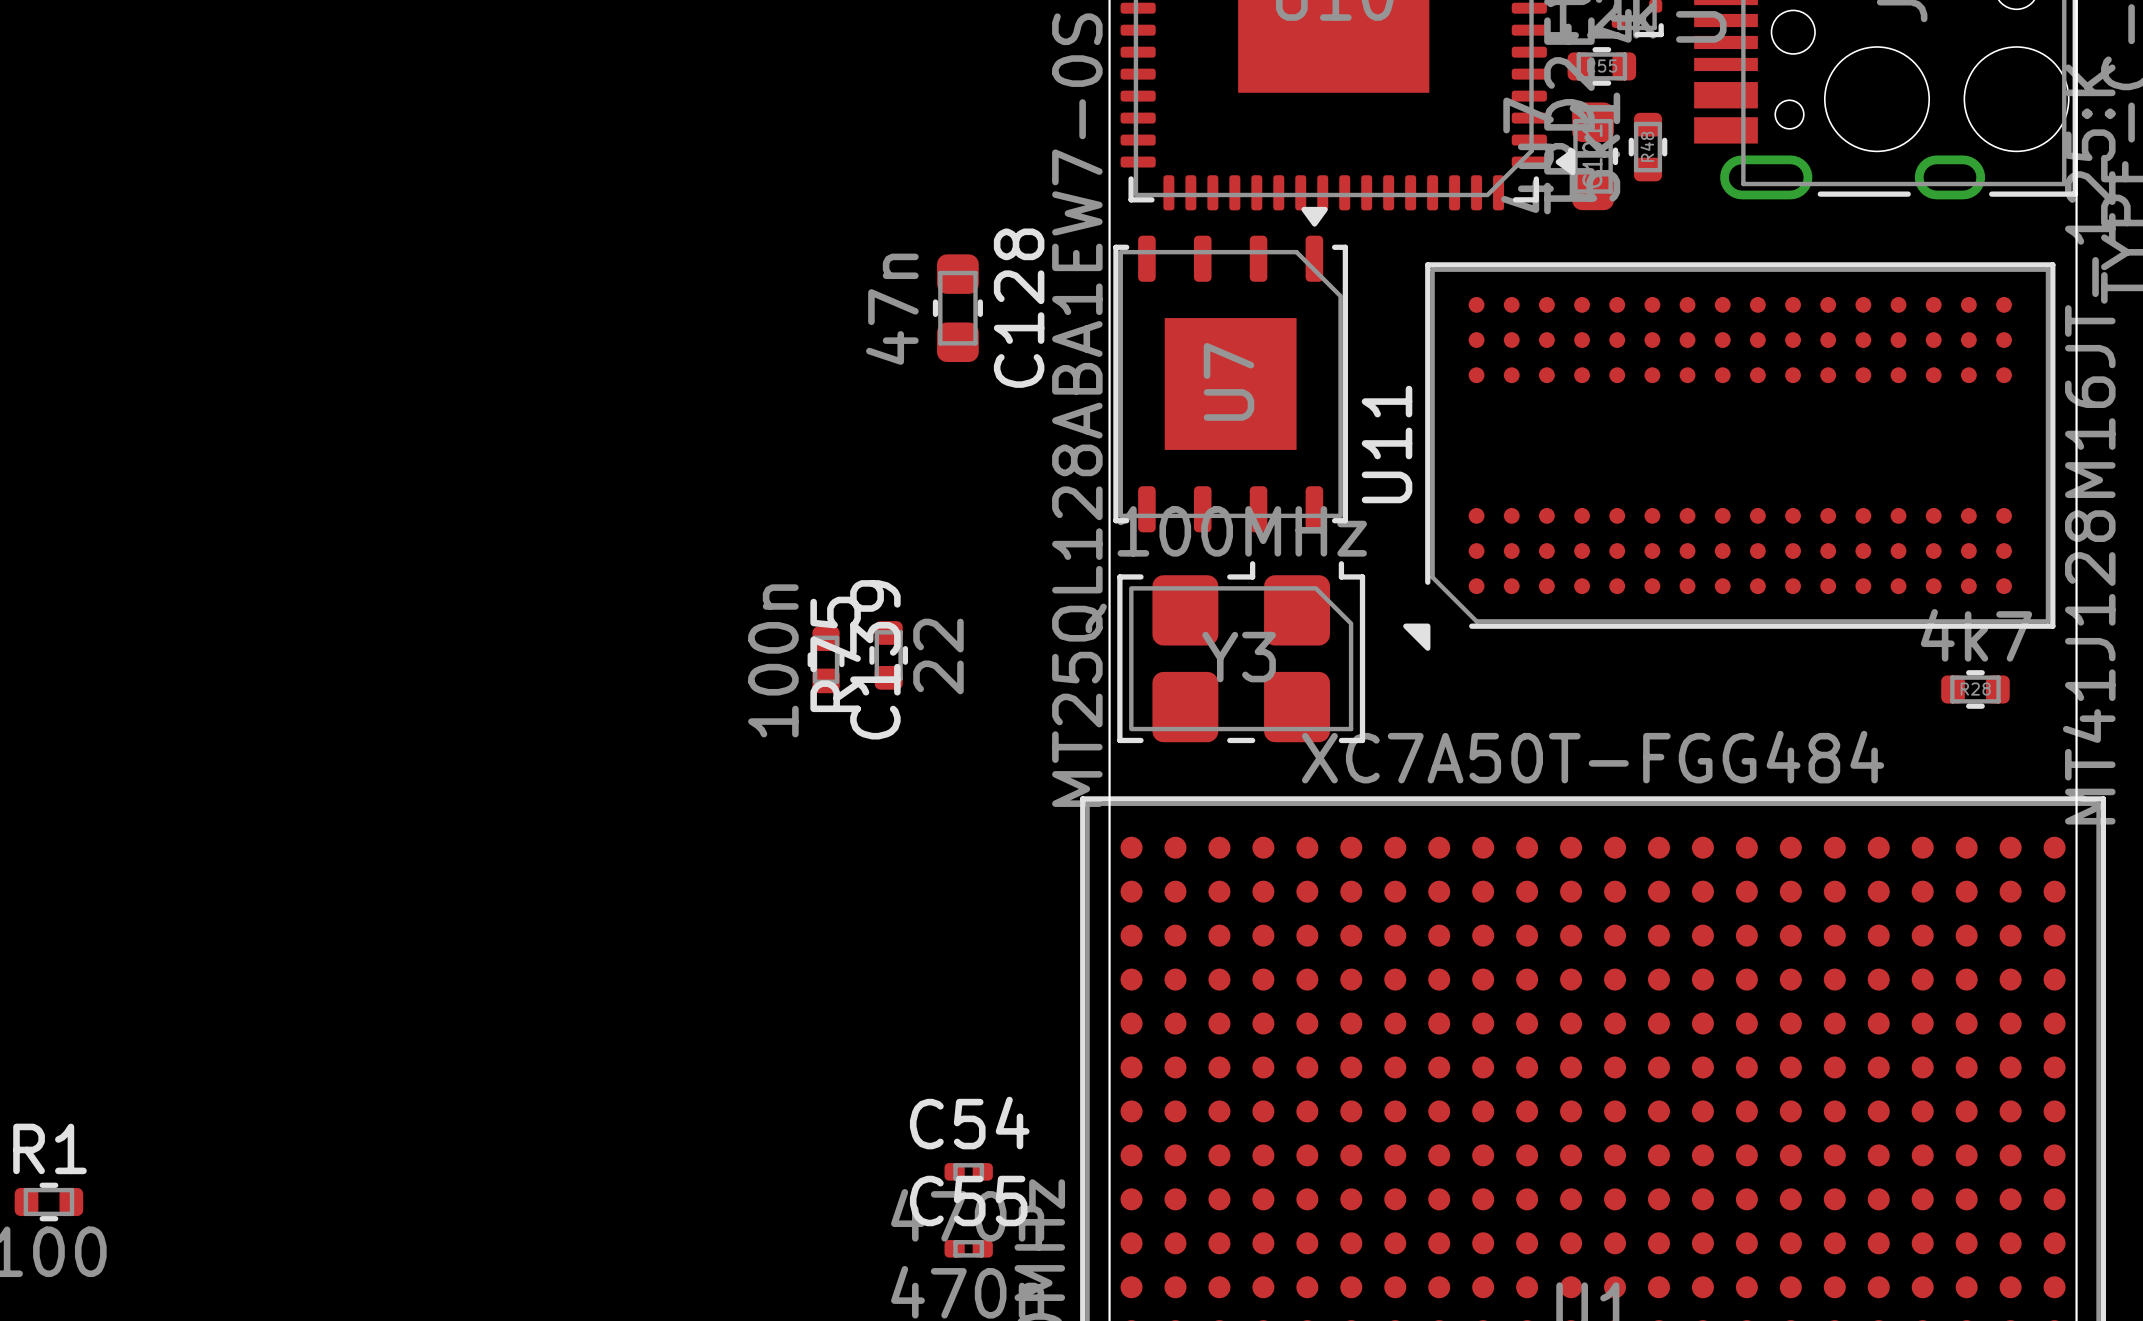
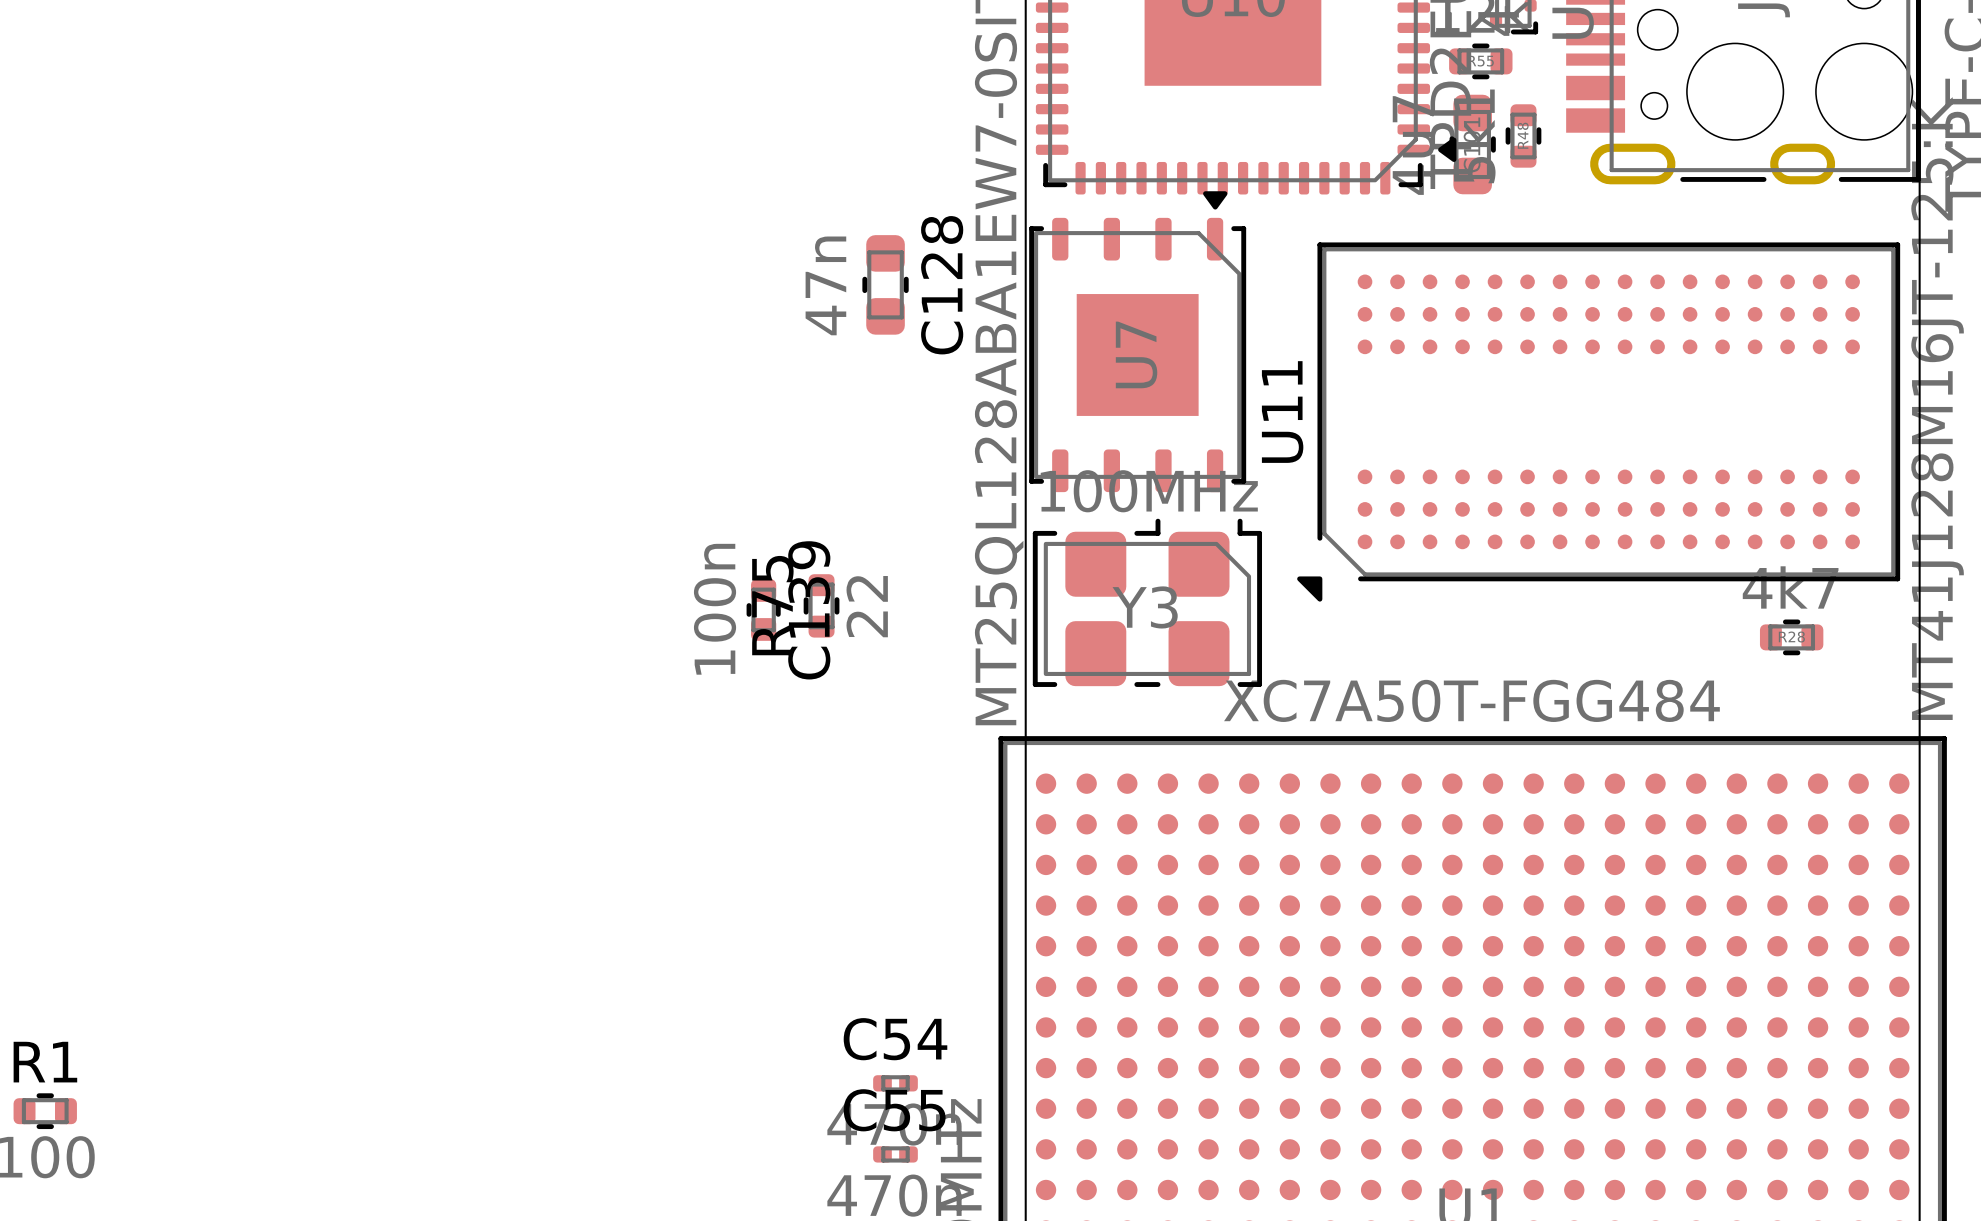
R28 position: (1975, 689) -> (1791, 637)

